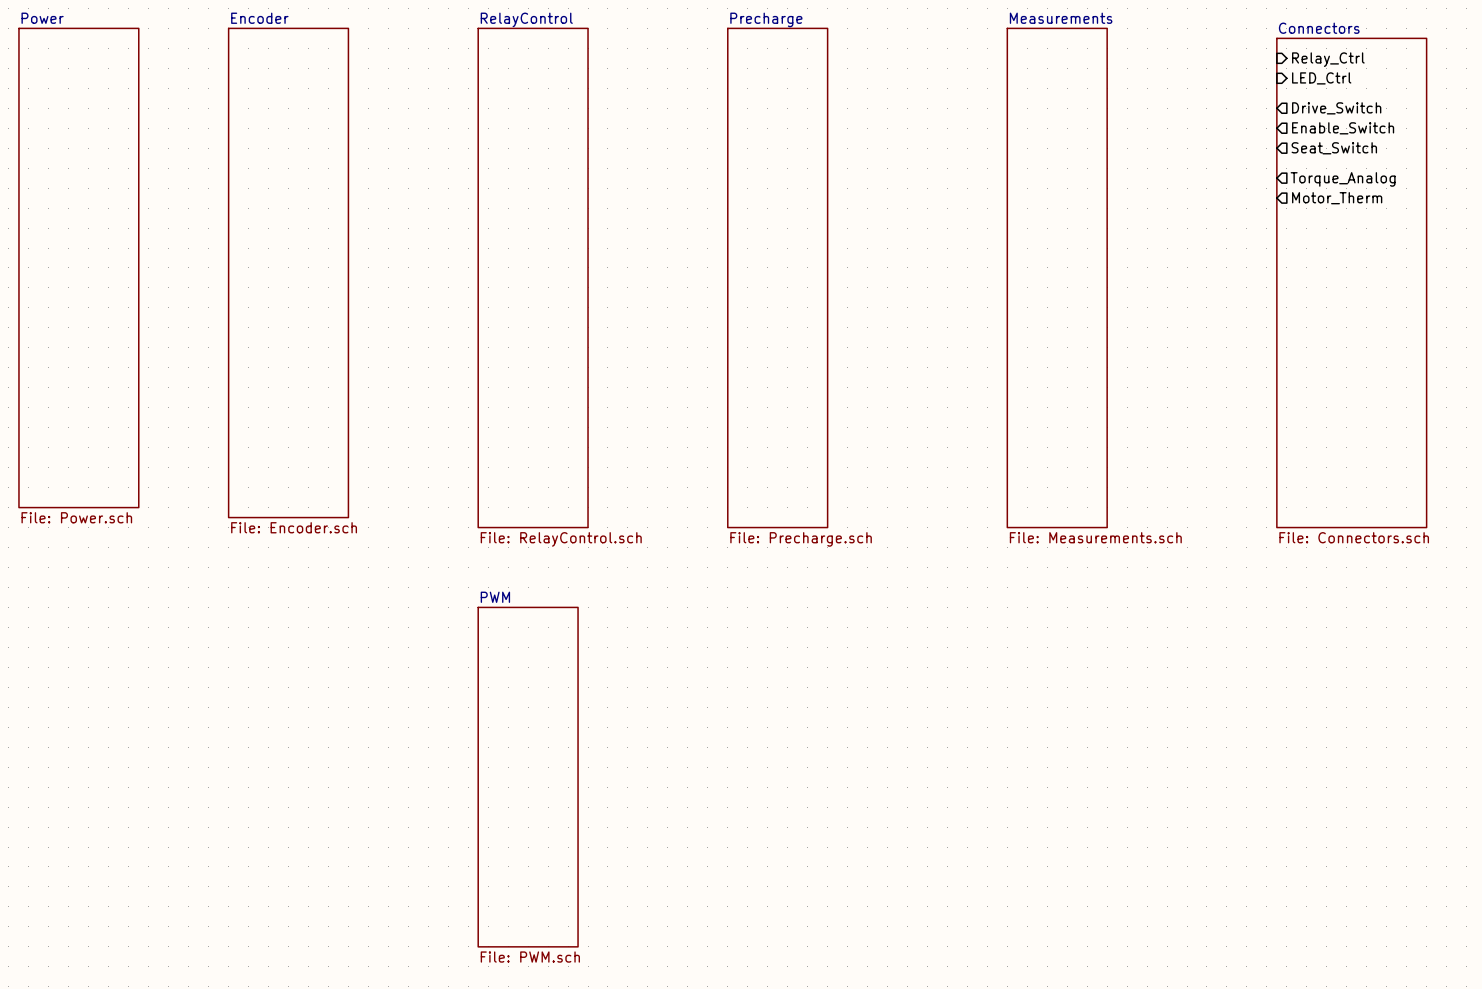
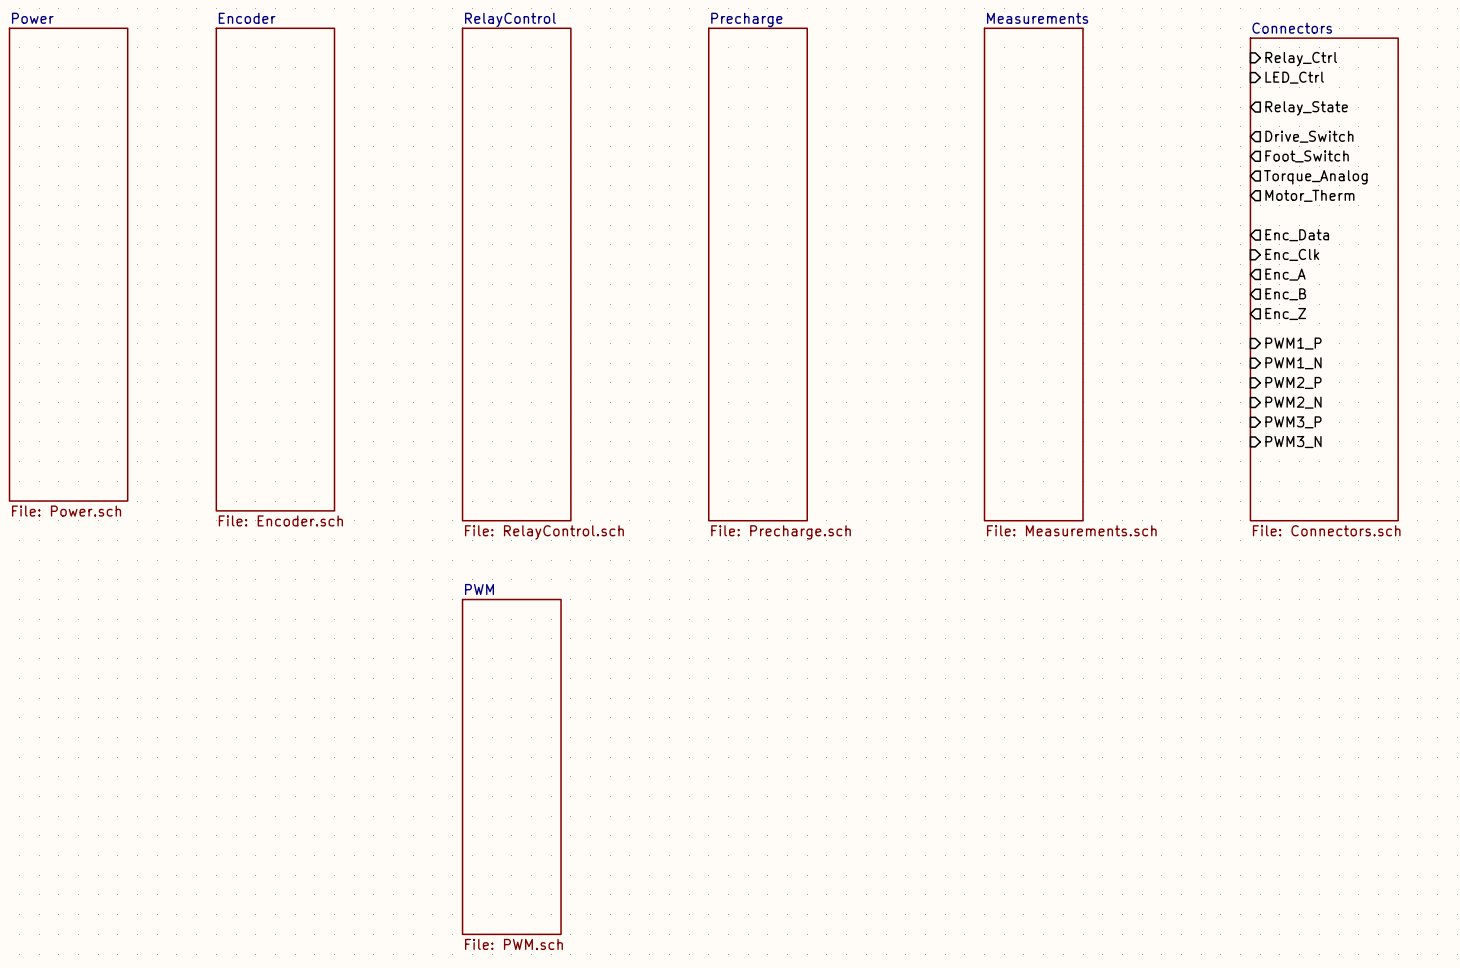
sheet pin: Drive_Switch (1336, 108) -> Relay_State (1306, 108)
sheet pin: Enable_Switch (1343, 128) -> none
sheet pin: none -> Drive_Switch (1309, 136)
sheet pin: Seat_Switch (1334, 148) -> none
sheet pin: none -> Foot_Switch (1307, 156)
sheet pin: none -> Enc_Data (1297, 235)
sheet pin: none -> Enc_Clk (1292, 254)
sheet pin: none -> Enc_A (1285, 274)
sheet pin: none -> Enc_B (1285, 294)
sheet pin: none -> Enc_Z (1285, 314)
sheet pin: none -> PWM1_P (1293, 343)
sheet pin: none -> PWM1_N (1293, 363)
sheet pin: none -> PWM2_P (1293, 382)
sheet pin: none -> PWM2_N (1293, 402)
sheet pin: none -> PWM3_P (1293, 422)
sheet pin: none -> PWM3_N (1293, 442)

